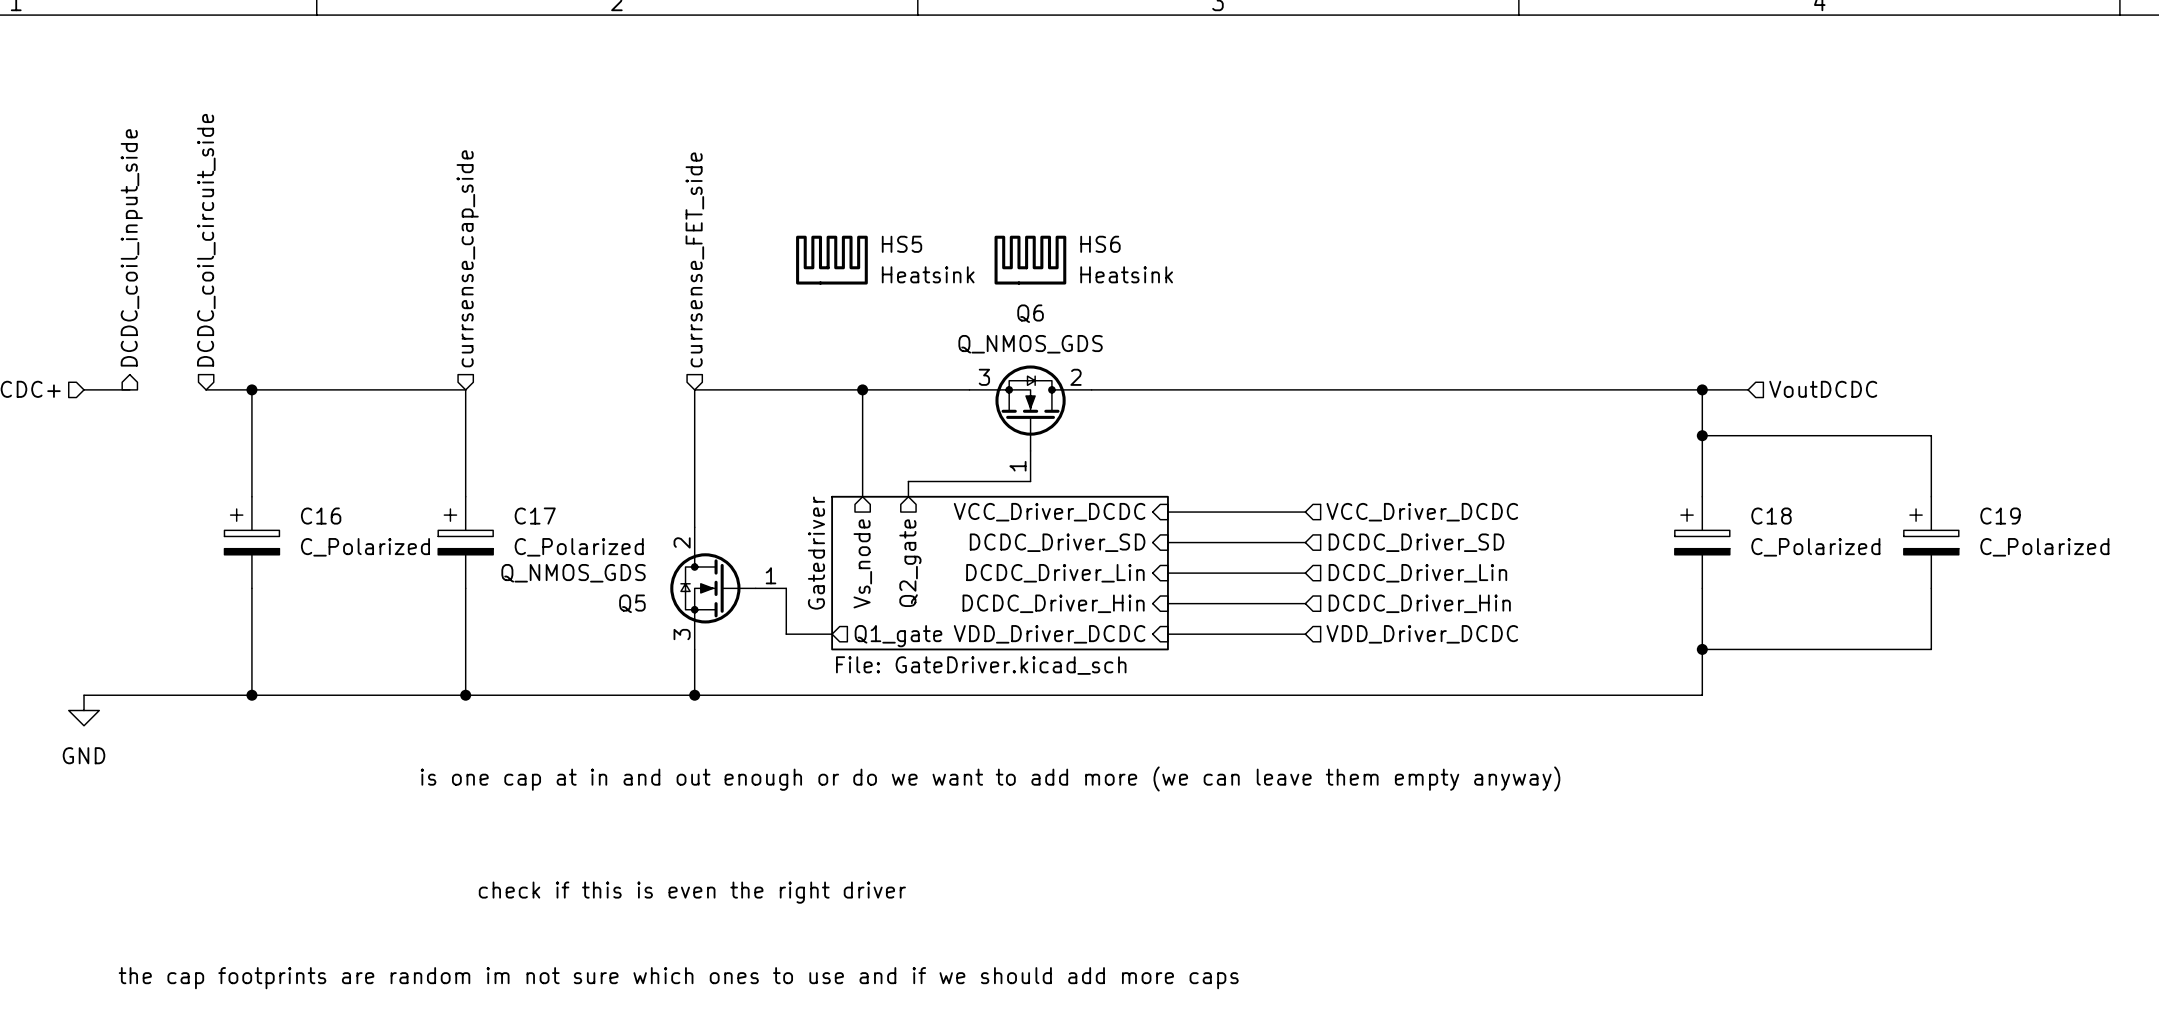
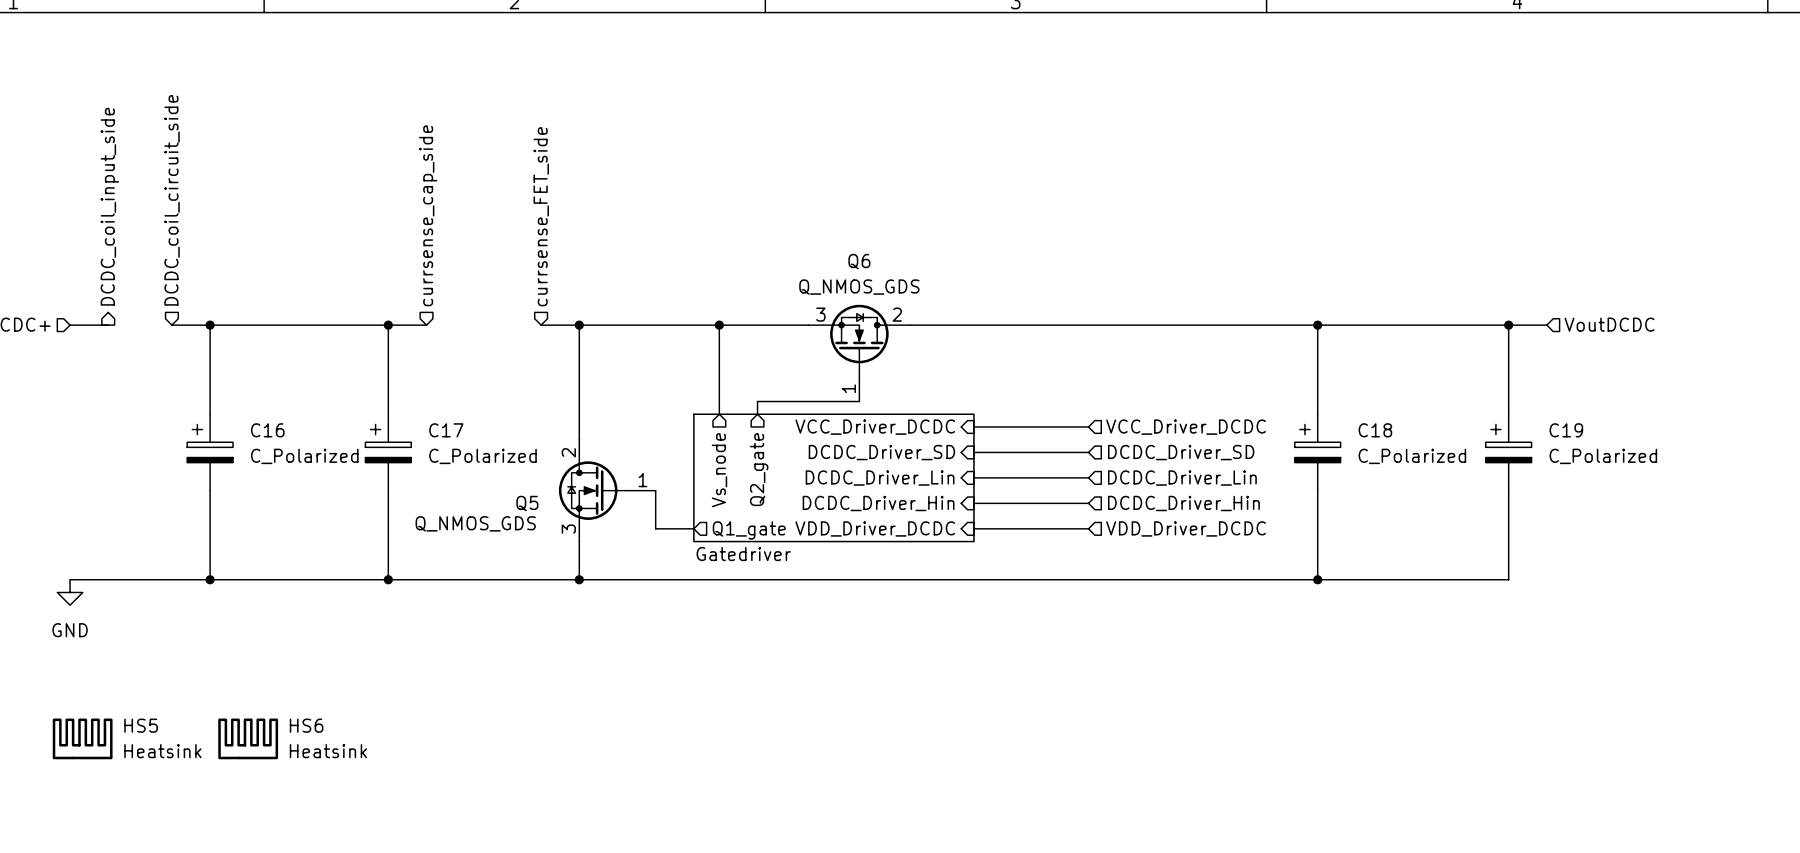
hierarchical label position: currsense_cap_side (467, 258) -> currsense_cap_side (428, 215)
hierarchical label position: currsense_FET_side (694, 259) -> currsense_FET_side (541, 216)
HS5 position: (831, 260) -> (82, 738)
HS6 position: (1030, 260) -> (248, 738)
wire: none -> (388, 325) (426, 325)
junction: none -> (388, 325)
wire: none -> (541, 325) (579, 325)
junction: none -> (579, 325)
junction: none -> (1317, 325)
wire: (1702, 389) (1702, 496) -> (1317, 325) (1317, 414)
junction: (1702, 389) -> none
wire: none -> (1457, 325) (1546, 325)
wire: none -> (1508, 325) (1508, 414)
junction: none -> (1508, 325)
hierarchical label position: VoutDCDC (1823, 389) -> VoutDCDC (1609, 324)
wire: (1702, 435) (1931, 435) (1931, 496) -> none
junction: (1702, 435) -> none
C18 position: (1702, 542) -> (1317, 452)
C19 position: (1931, 542) -> (1508, 452)
sheet Gatedriver name rotation: 0° (816, 553) -> 90° clockwise (743, 554)
sheet Gatedriver name position: Gatedriver (816, 553) -> Gatedriver (743, 554)
Q5 value position: Q_NMOS_GDS (573, 573) -> Q_NMOS_GDS (475, 523)
wire: none -> (1317, 490) (1317, 579)
wire: (1702, 588) (1702, 695) -> (1508, 490) (1508, 579) (1419, 579)
wire: (1931, 588) (1931, 649) (1702, 649) -> none
junction: (1702, 649) -> none
sheet Gatedriver value: File: GateDriver.kicad_sch (981, 665) -> none
junction: none -> (1317, 579)
text: is one cap at in and out enough or do we want to add more (we can leave them empty anyway) (990, 778) -> none
text: check if this is even the right driver (692, 892) -> none
text: the cap footprints are random im not sure which ones to use and if we should add more caps (678, 978) -> none

